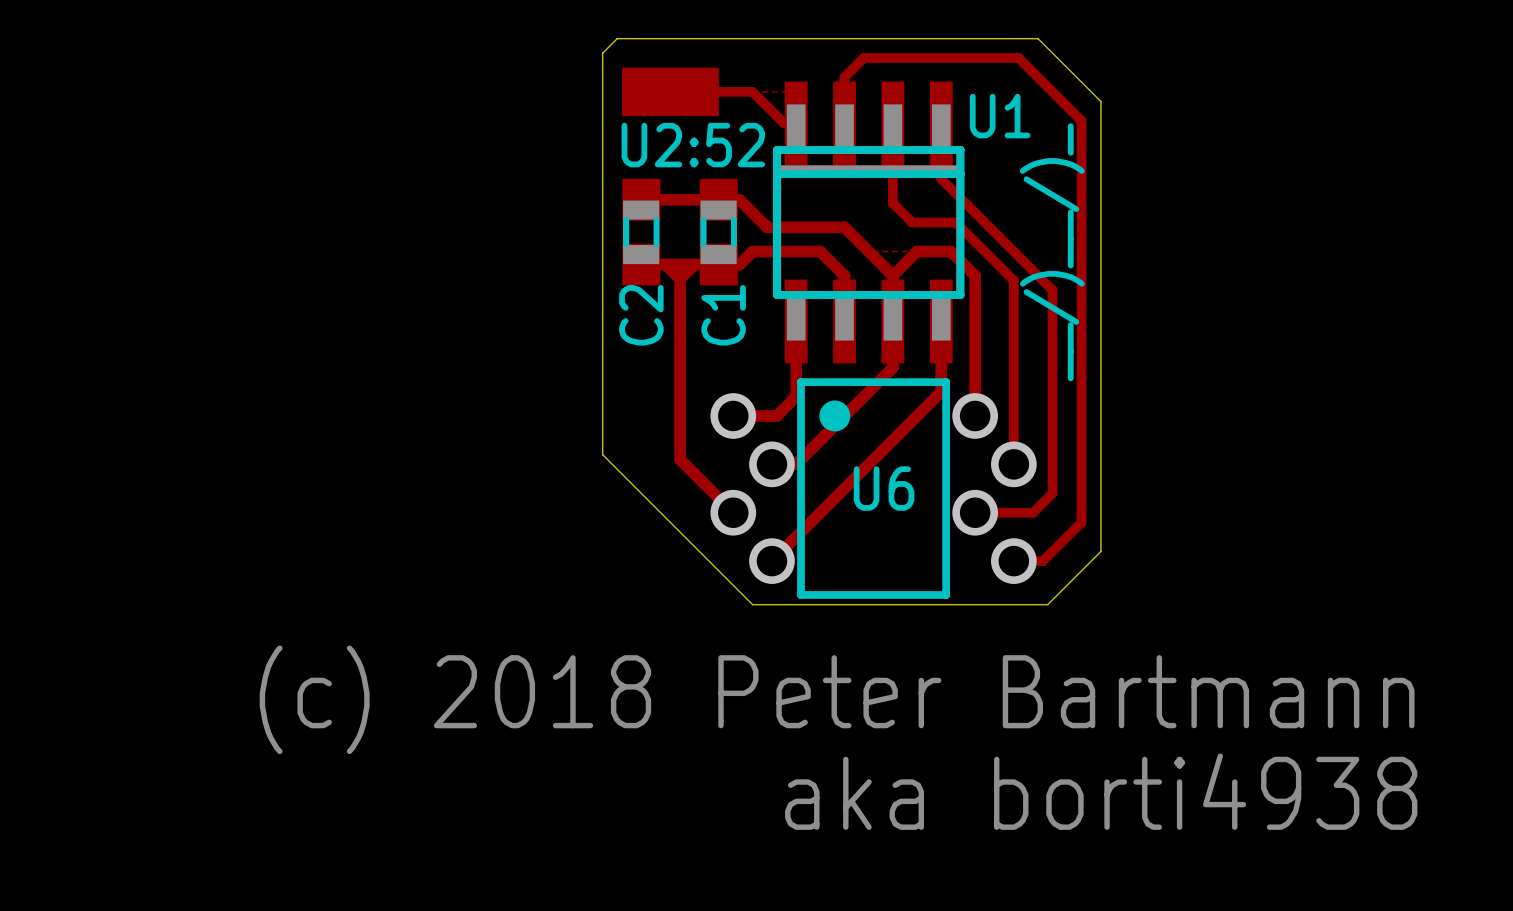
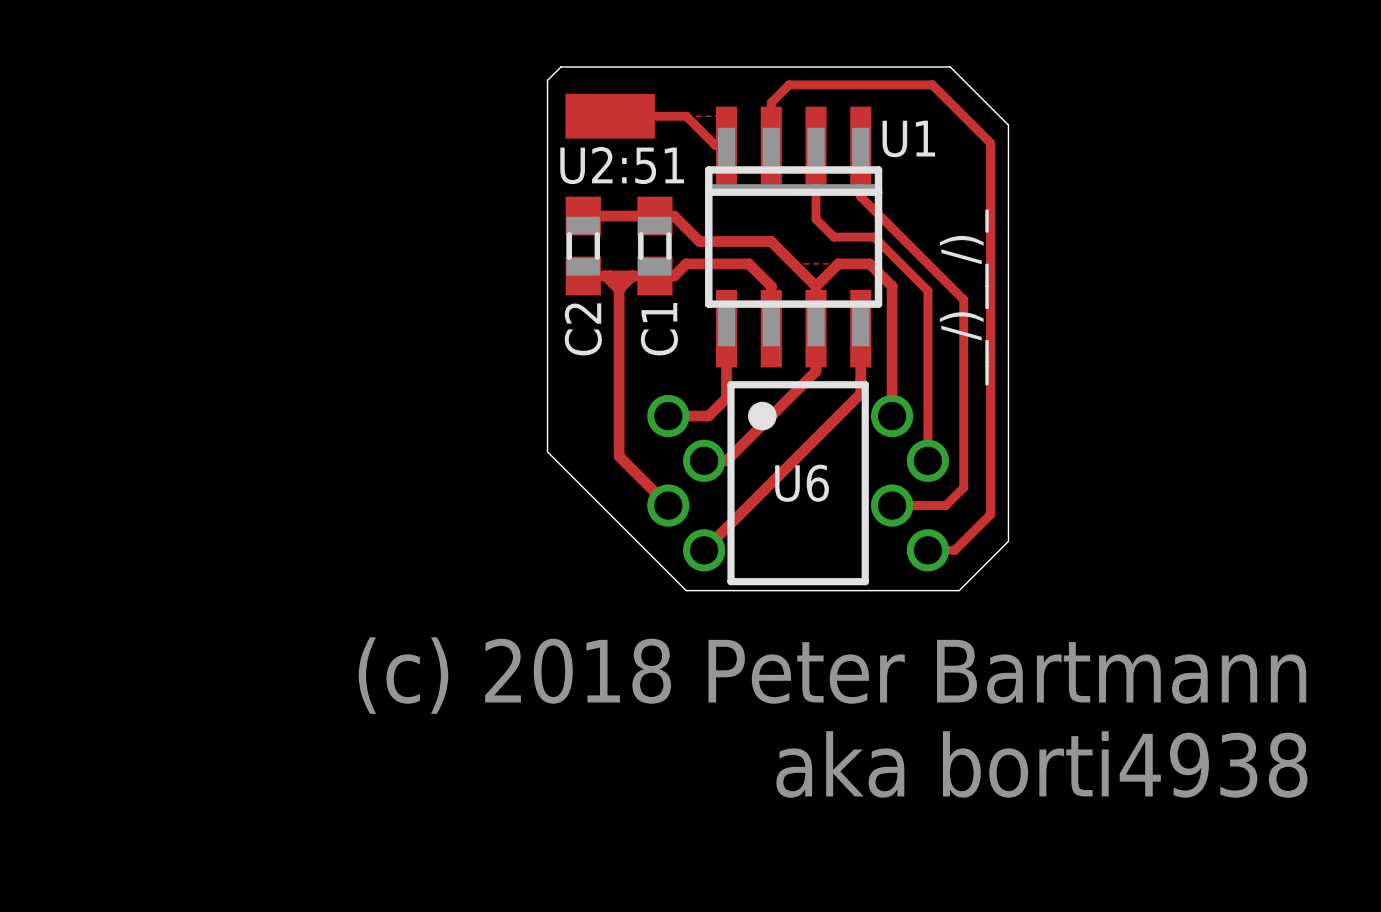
text: U2:52 (693, 145) -> U2:51 (622, 165)

